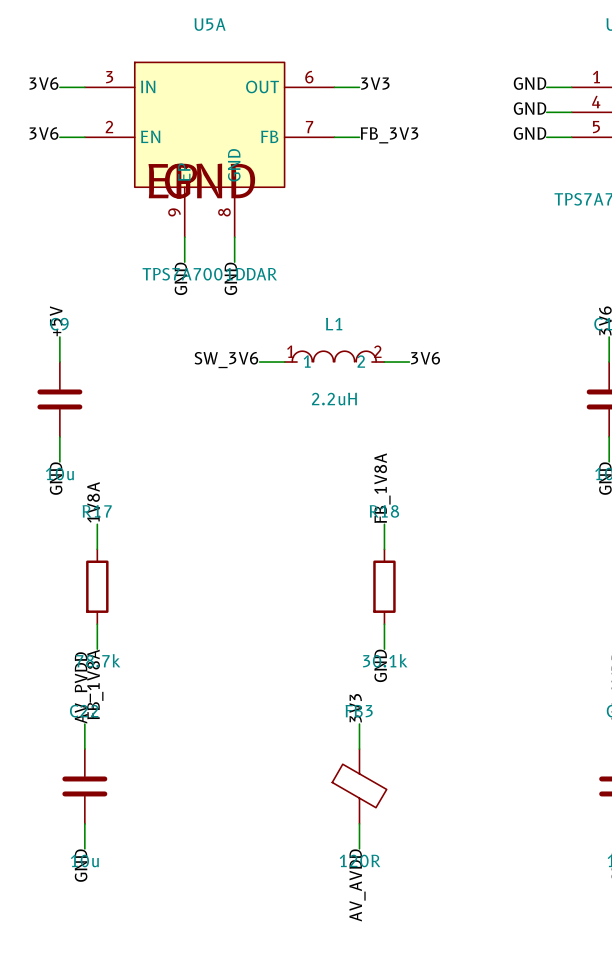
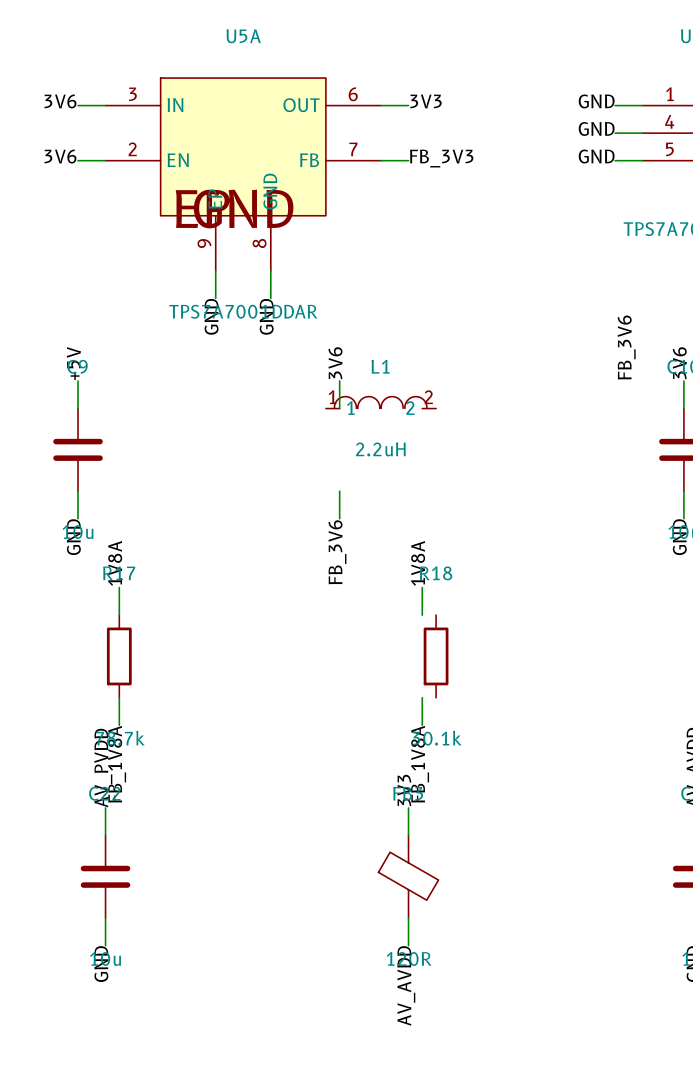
label: none -> FB_3V6 (626, 347)
wire: none -> (339, 381) (339, 408)
label rotation: 0° (425, 358) -> 90° counterclockwise (335, 363)
label position: 3V6 (425, 358) -> 3V6 (335, 363)
label: SW_3V6 (226, 360) -> none
wire: (259, 362) (284, 362) -> none
wire: (384, 362) (409, 362) -> none
wire: none -> (339, 491) (339, 518)
label position: FB_1V8A (382, 488) -> FB_1V8A (420, 764)
label: none -> FB_3V6 (337, 552)
label: none -> 1V8A (418, 563)
wire: (384, 524) (384, 549) -> (422, 587) (422, 615)
wire: (384, 624) (384, 649) -> (422, 697) (422, 725)
label: GND (380, 665) -> none

